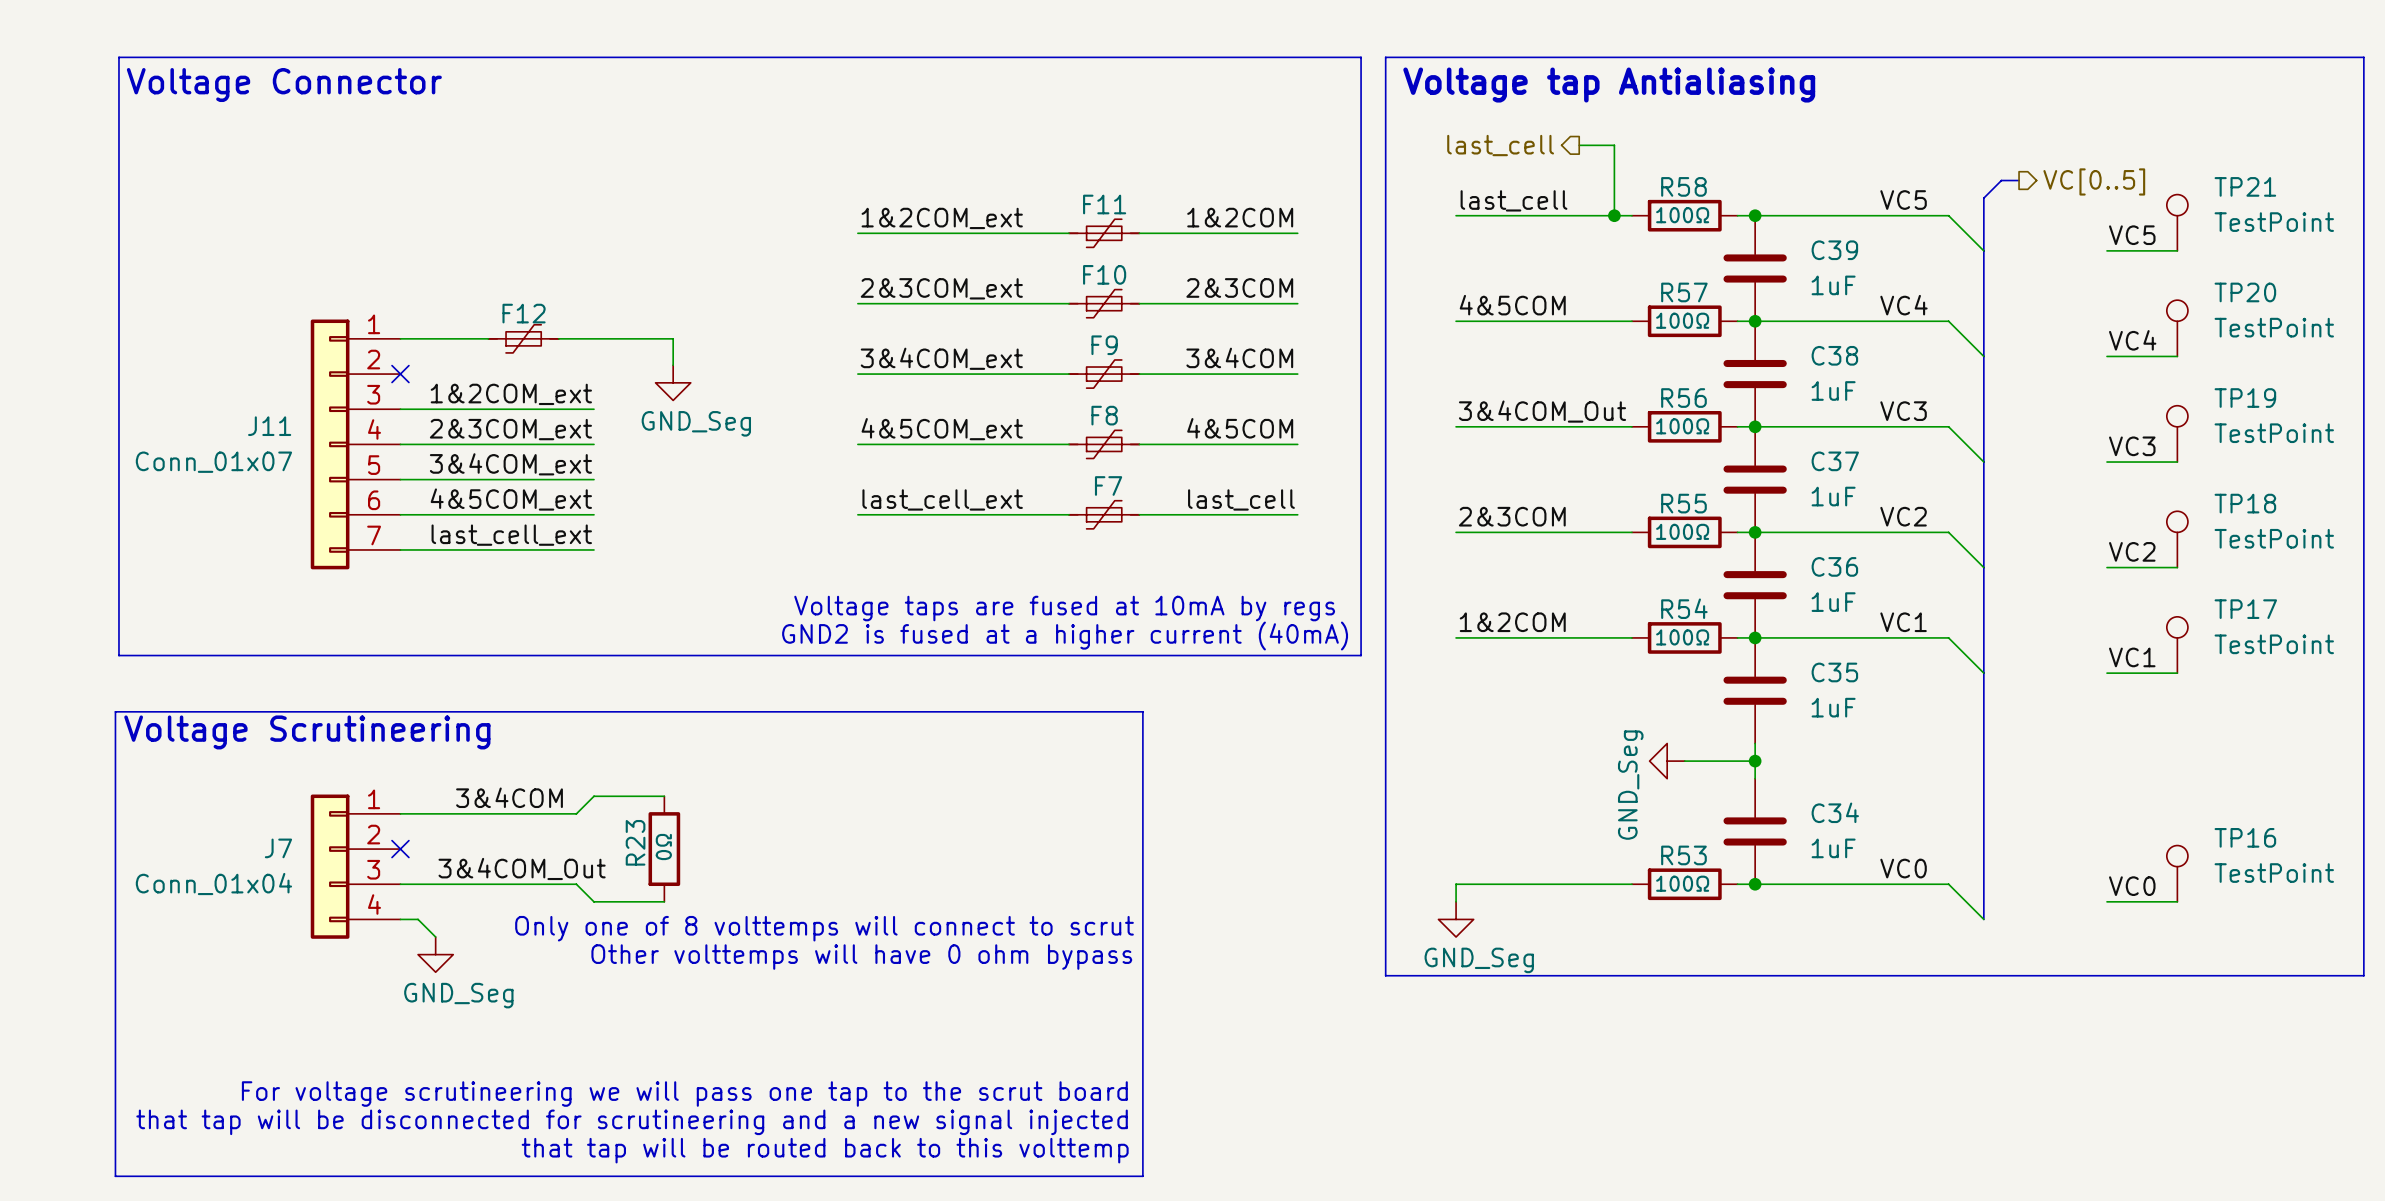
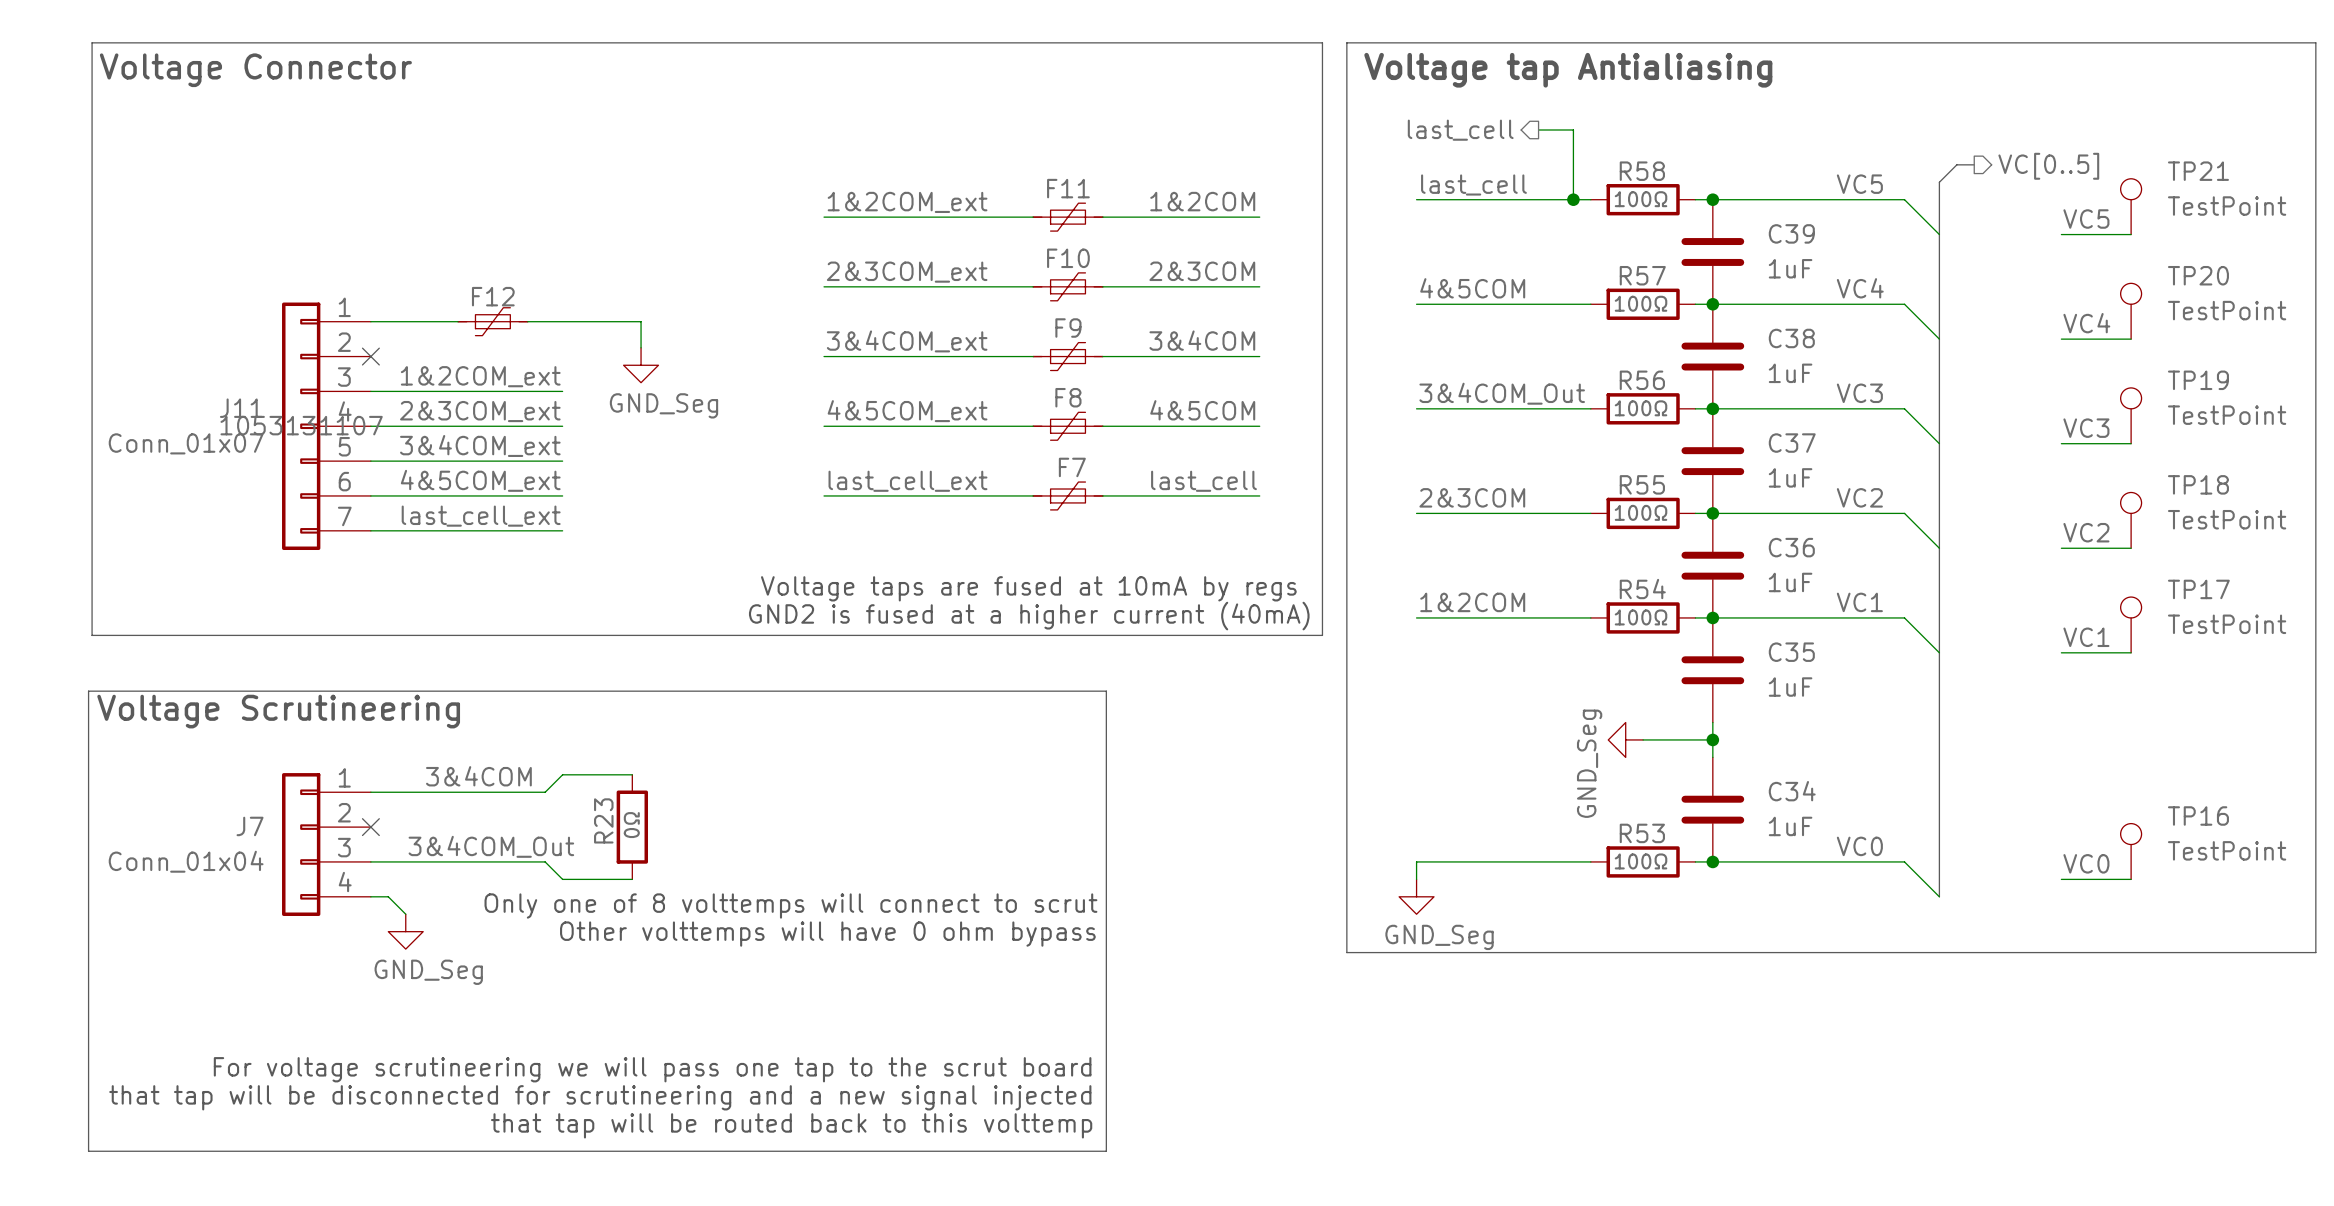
J11 text: none -> 1053131107 (301, 425)

